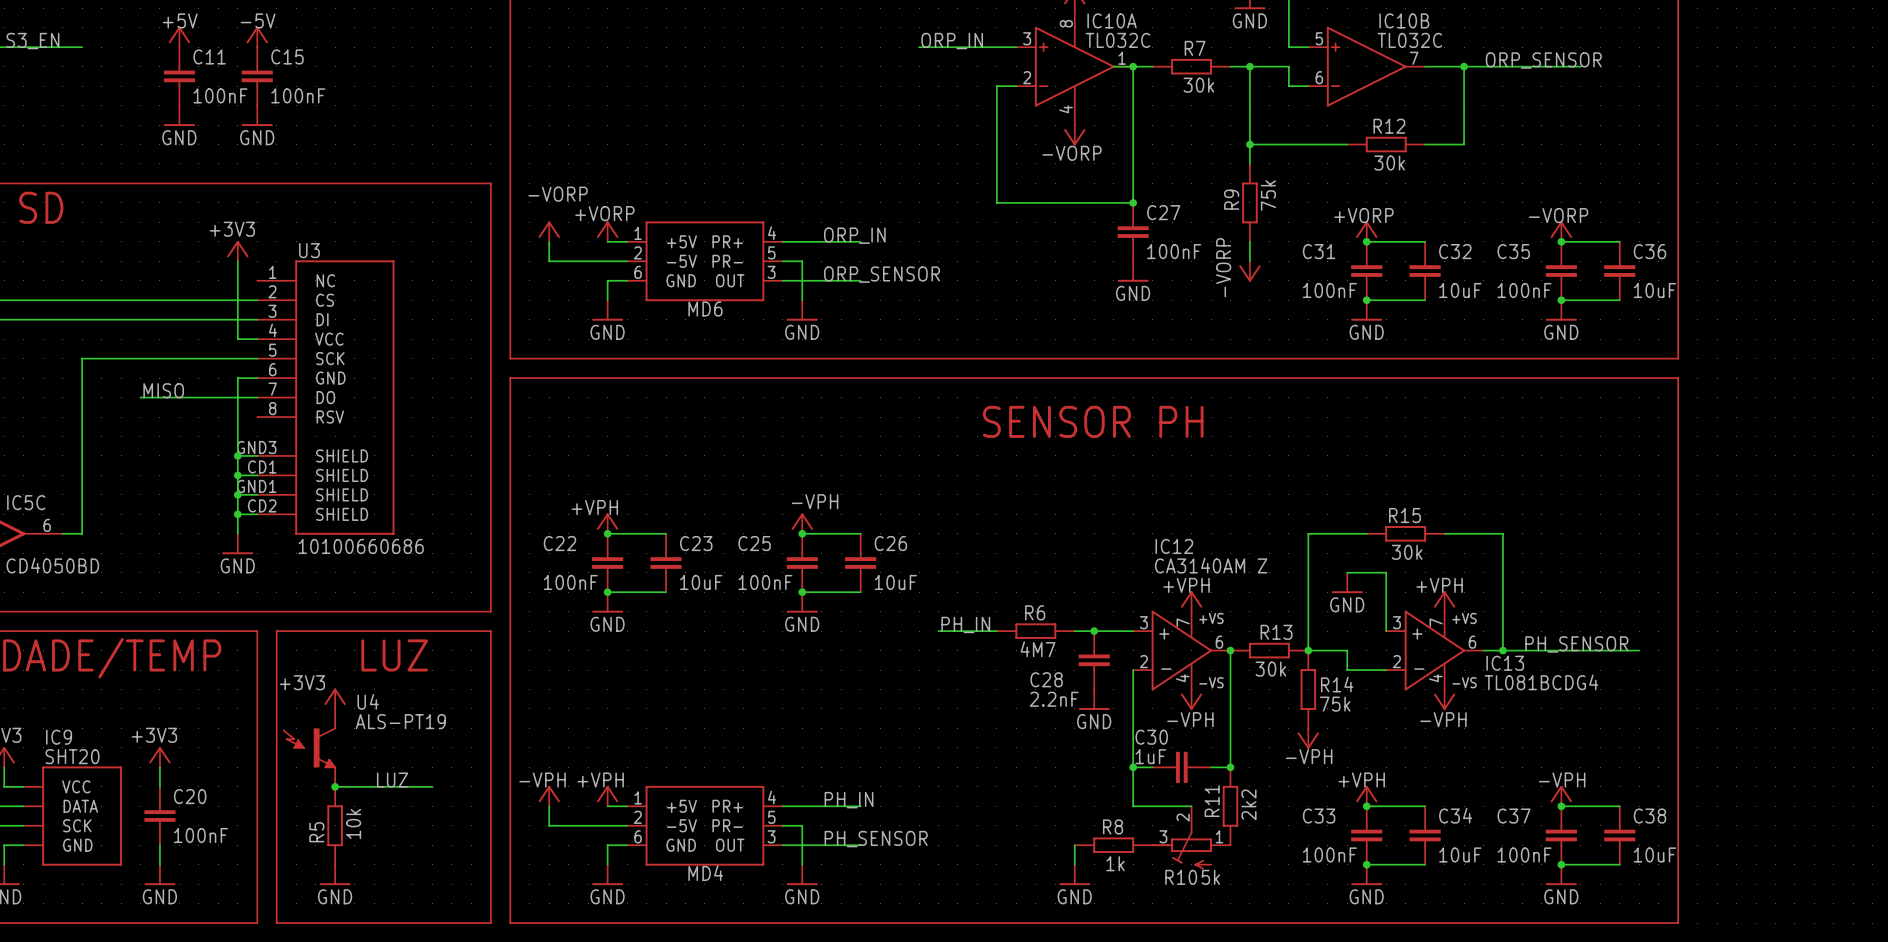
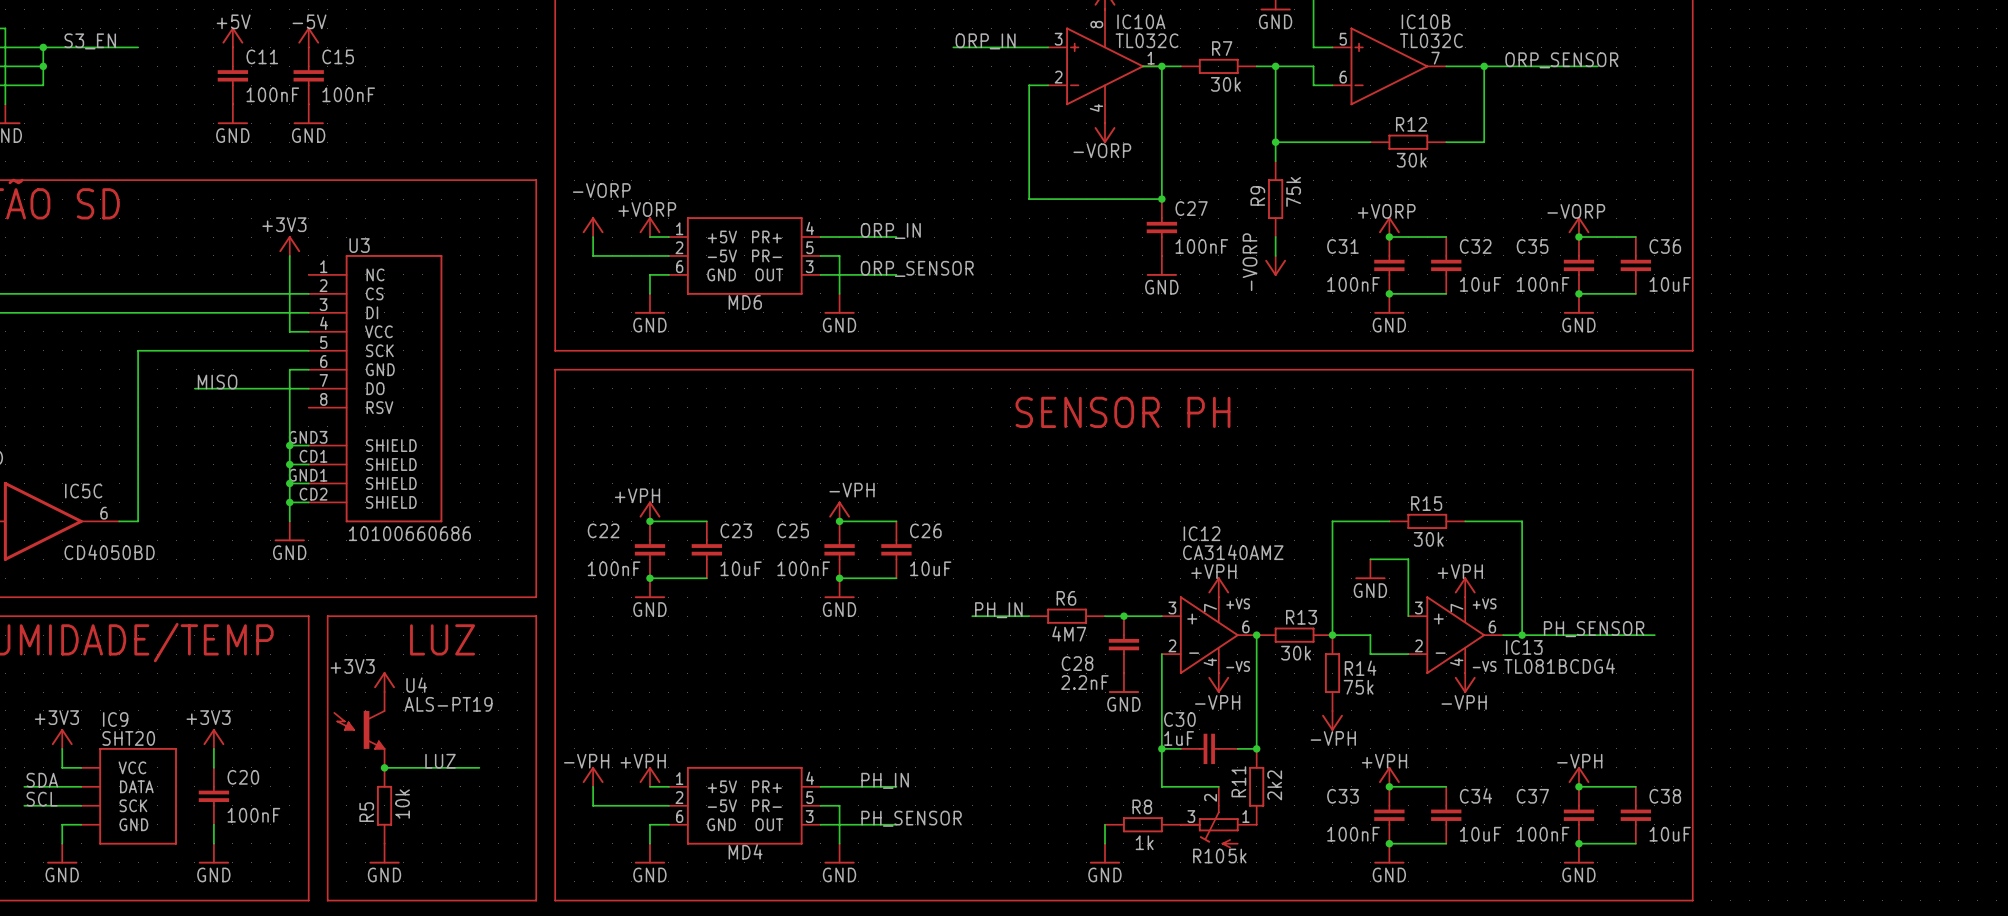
IC12 value: CA3140AM Z (1211, 565) -> CA3140AMZ (1233, 552)

